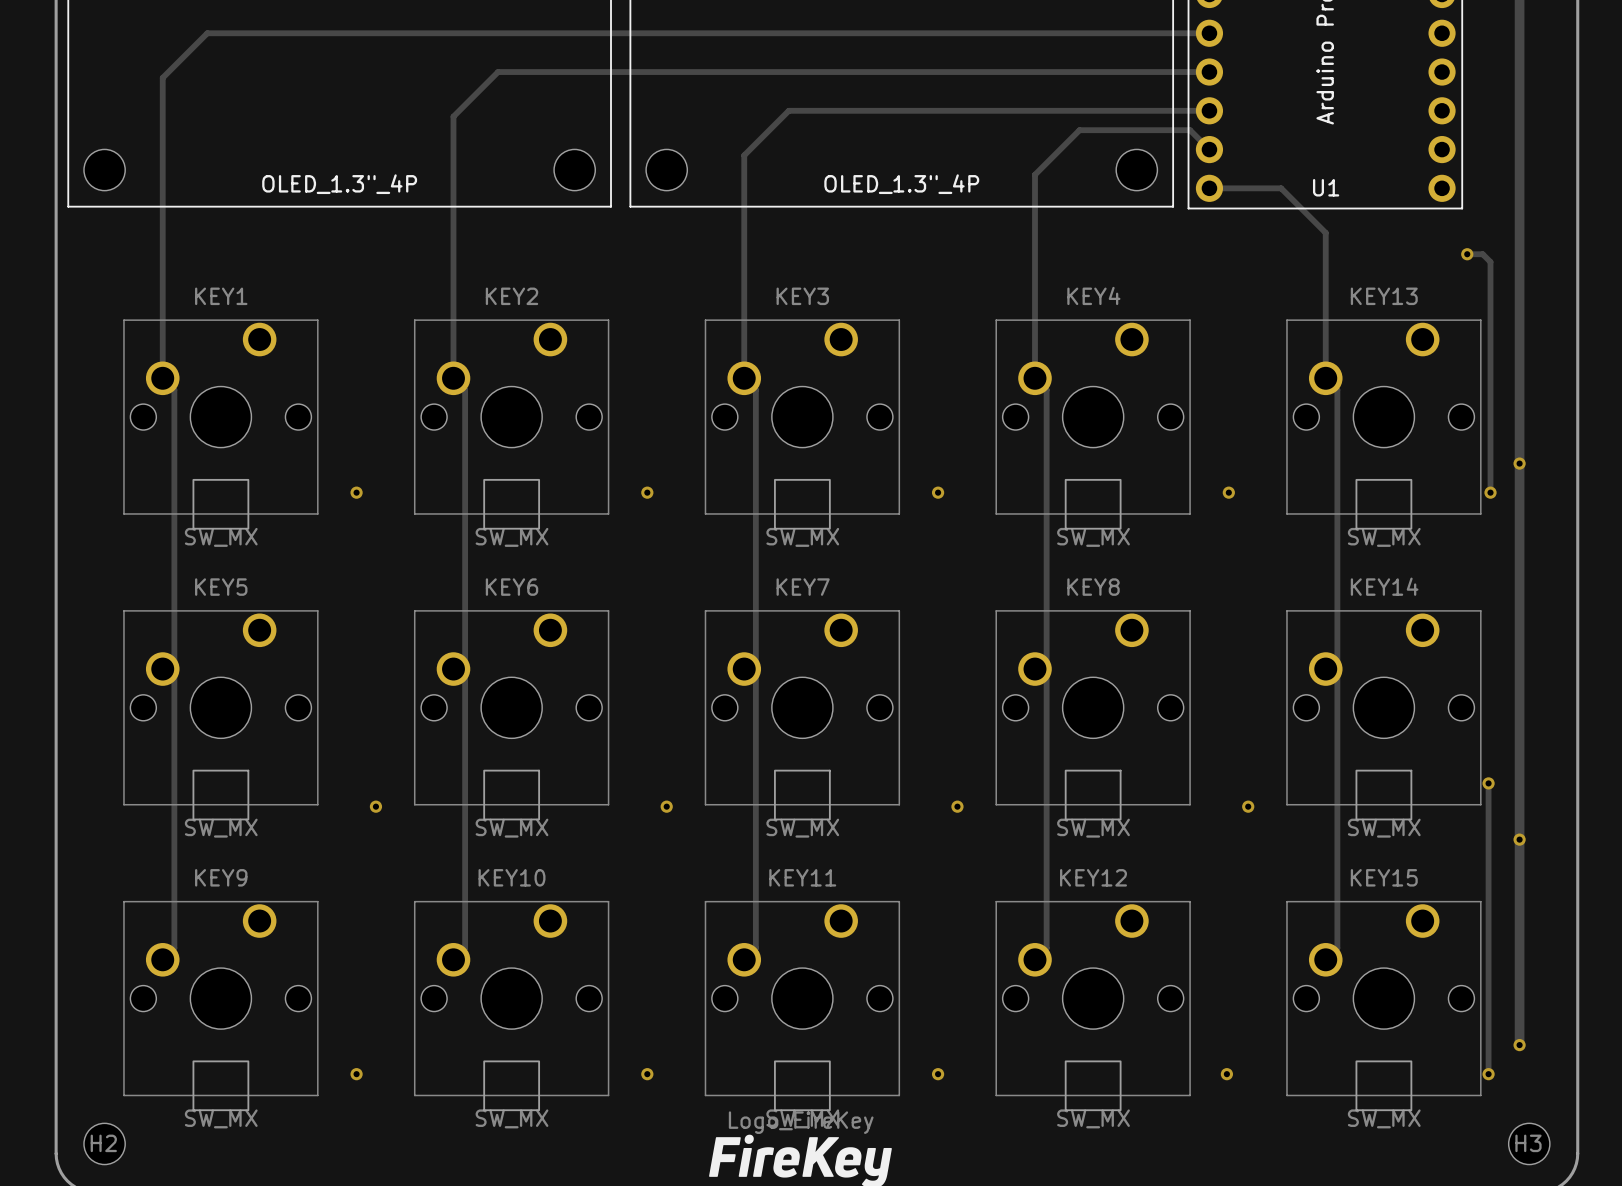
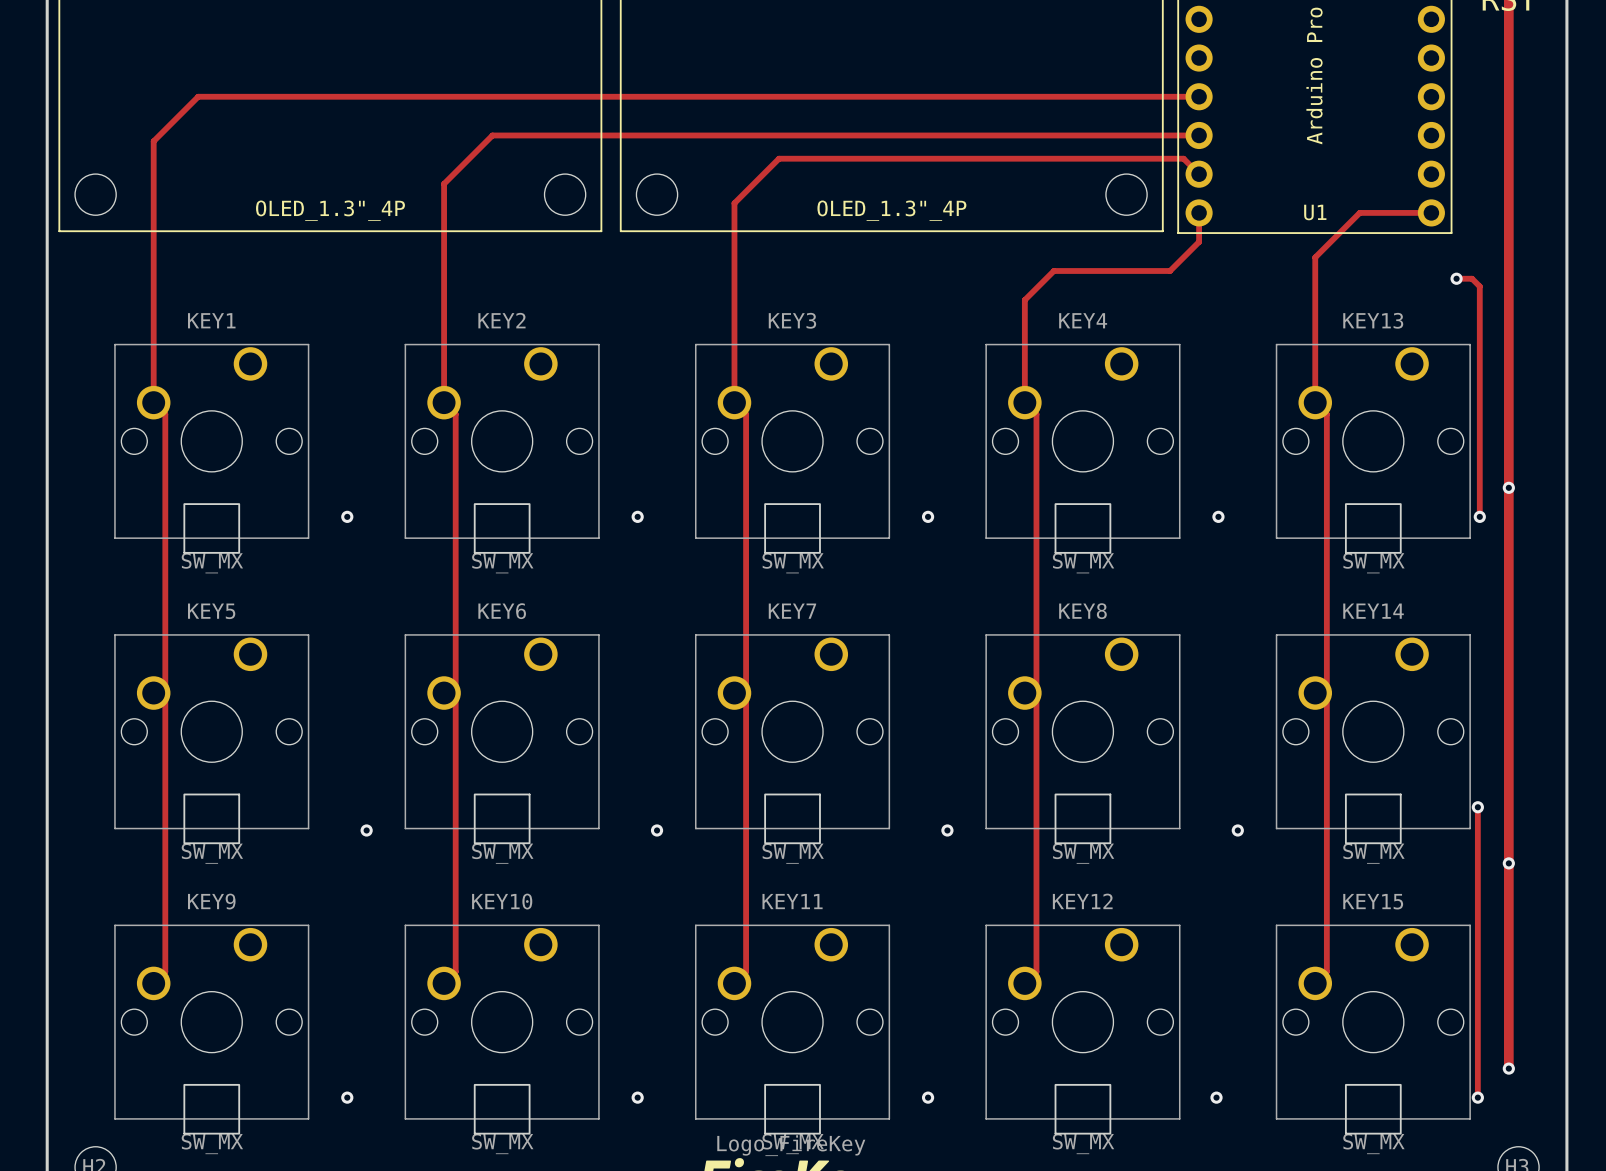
track: (1209, 33) (207, 33) (162, 77) (162, 116) -> none
track: (498, 72) (453, 116) (453, 159) -> (488, 96) (198, 96) (153, 141)
track: (788, 110) (744, 155) (744, 178) -> (778, 135) (492, 135) (444, 183)
track: (1193, 134) (1190, 130) (1079, 130) (1035, 174) (1035, 275) -> (1199, 212) (1199, 241) (1170, 271) (1053, 271) (1024, 300)
track: none -> (1183, 158) (778, 158) (734, 203)
track: (1209, 188) (1281, 188) (1325, 232) -> (1431, 212) (1359, 212) (1315, 257)

